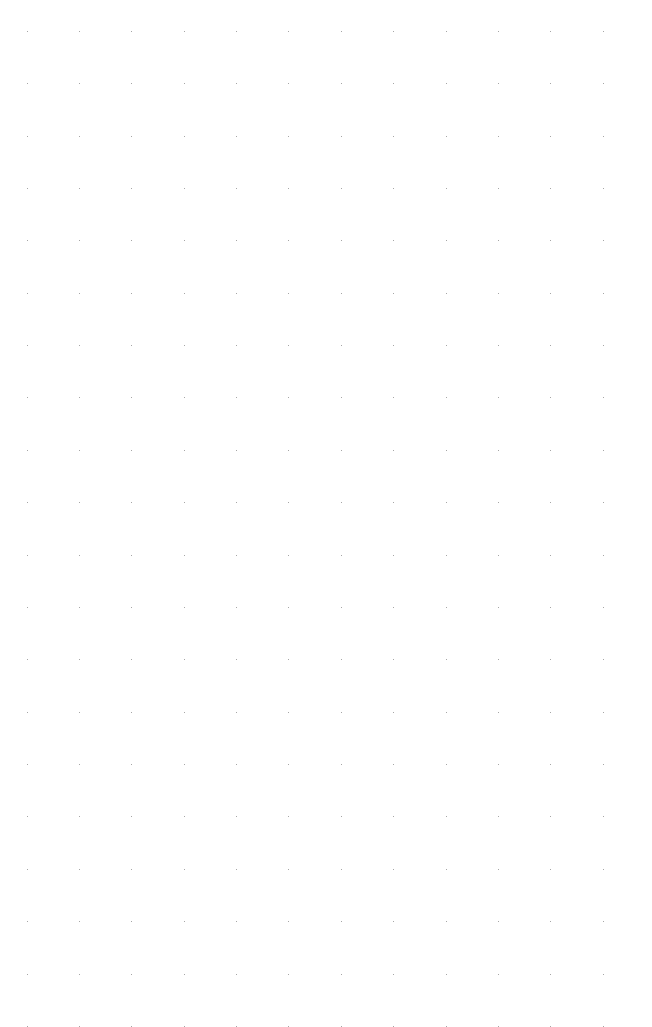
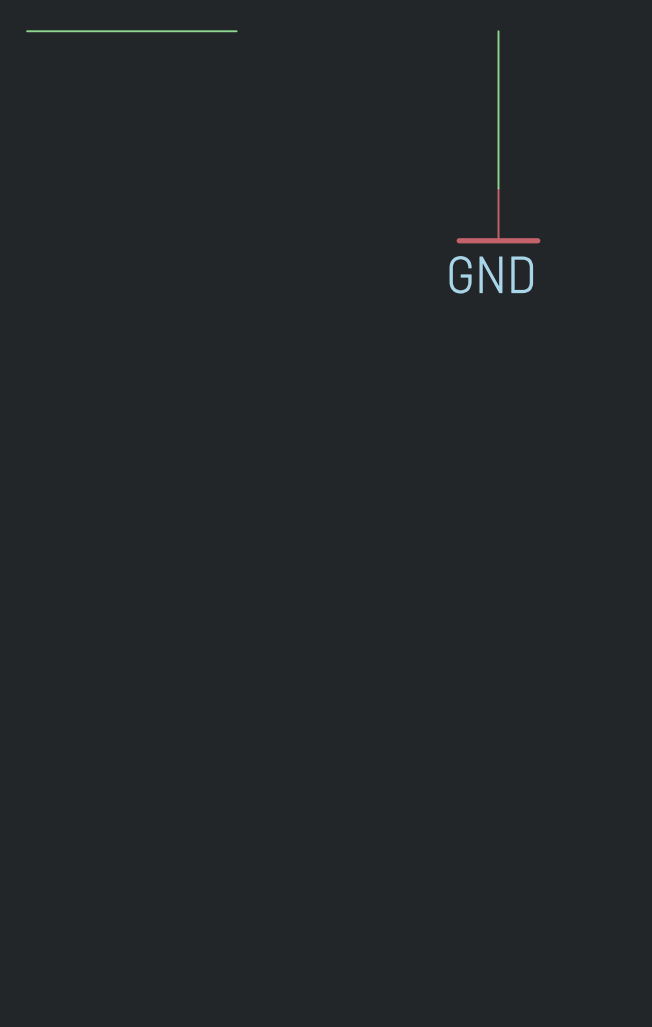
wire: none -> (27, 31) (236, 31)
wire: none -> (498, 31) (498, 188)
power symbol: none -> GND (498, 215)

